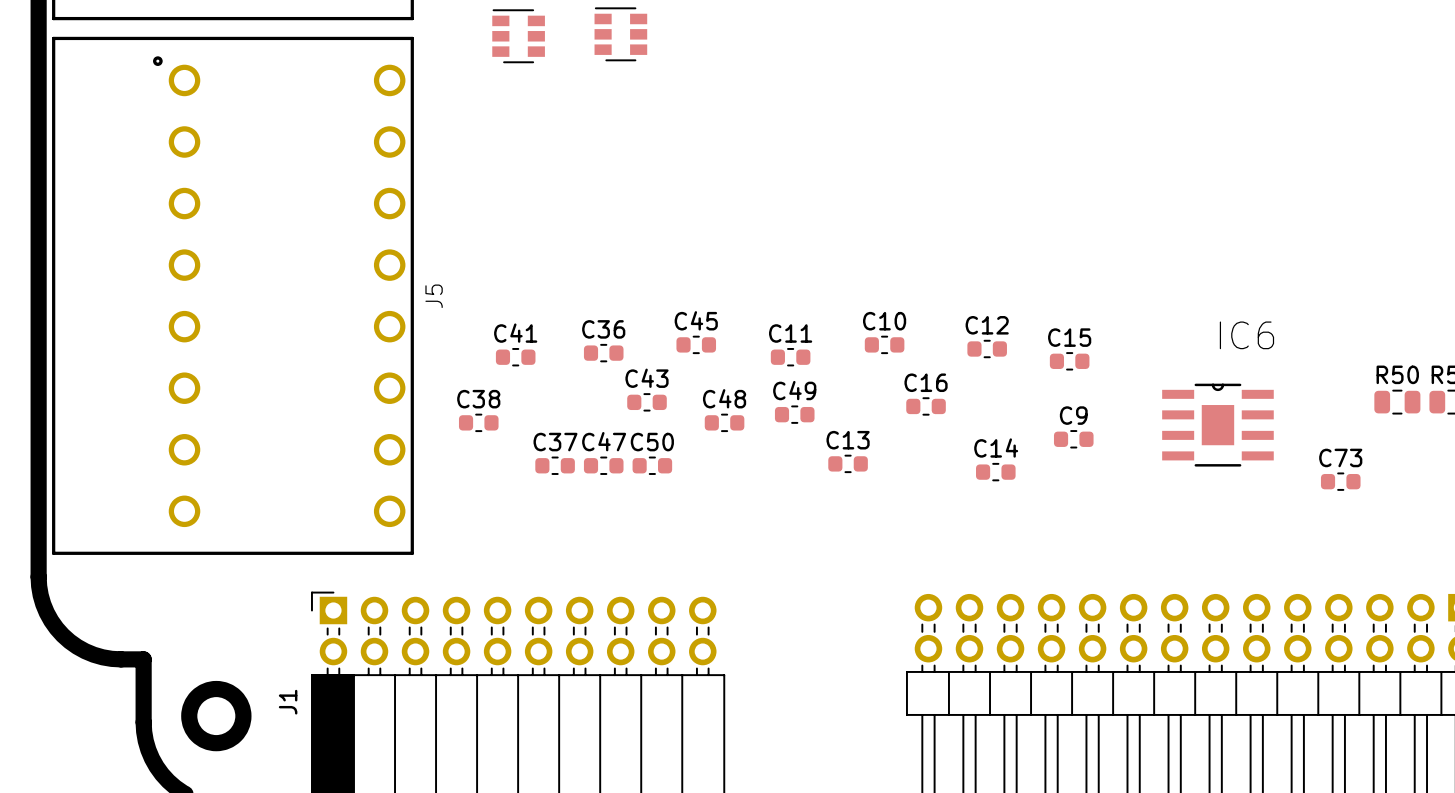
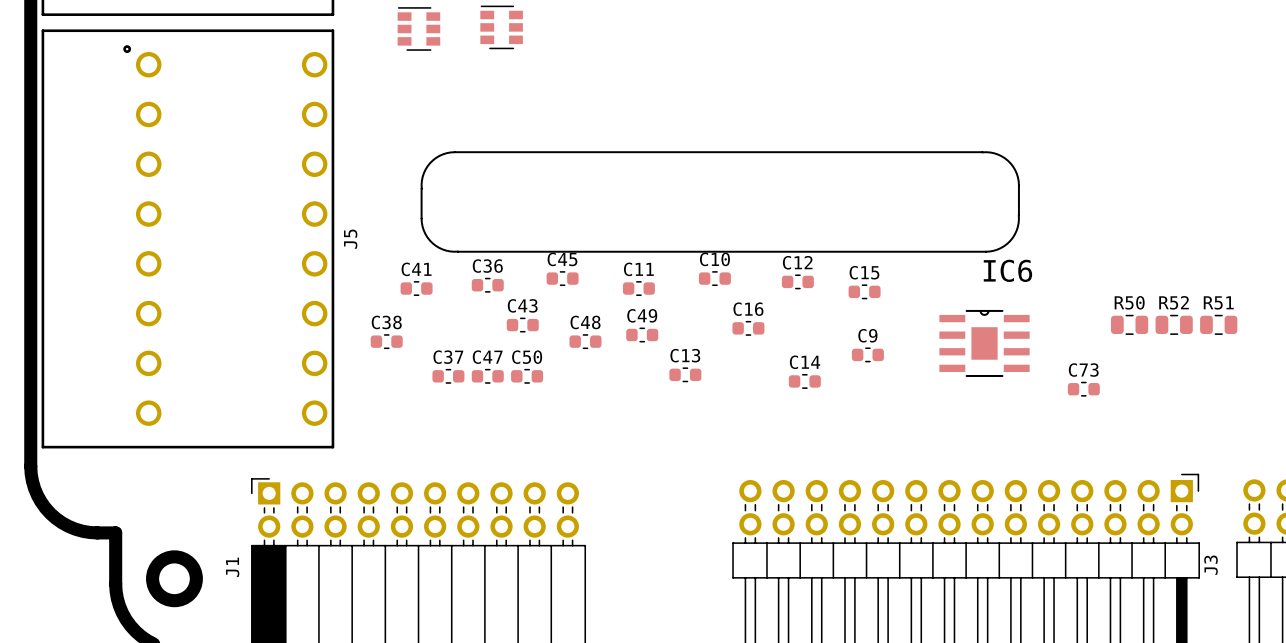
board edge: none -> (982, 152) (450, 152) (436, 157) (427, 166) (422, 176) (421, 188)
board edge: none -> (982, 152) (1001, 156) (1015, 170) (1018, 181) (1018, 215)
board edge: none -> (421, 188) (421, 222) (425, 233) (438, 247) (458, 251)
board edge: none -> (1018, 215) (1017, 227) (1012, 237) (1004, 246) (989, 251) (458, 251)

